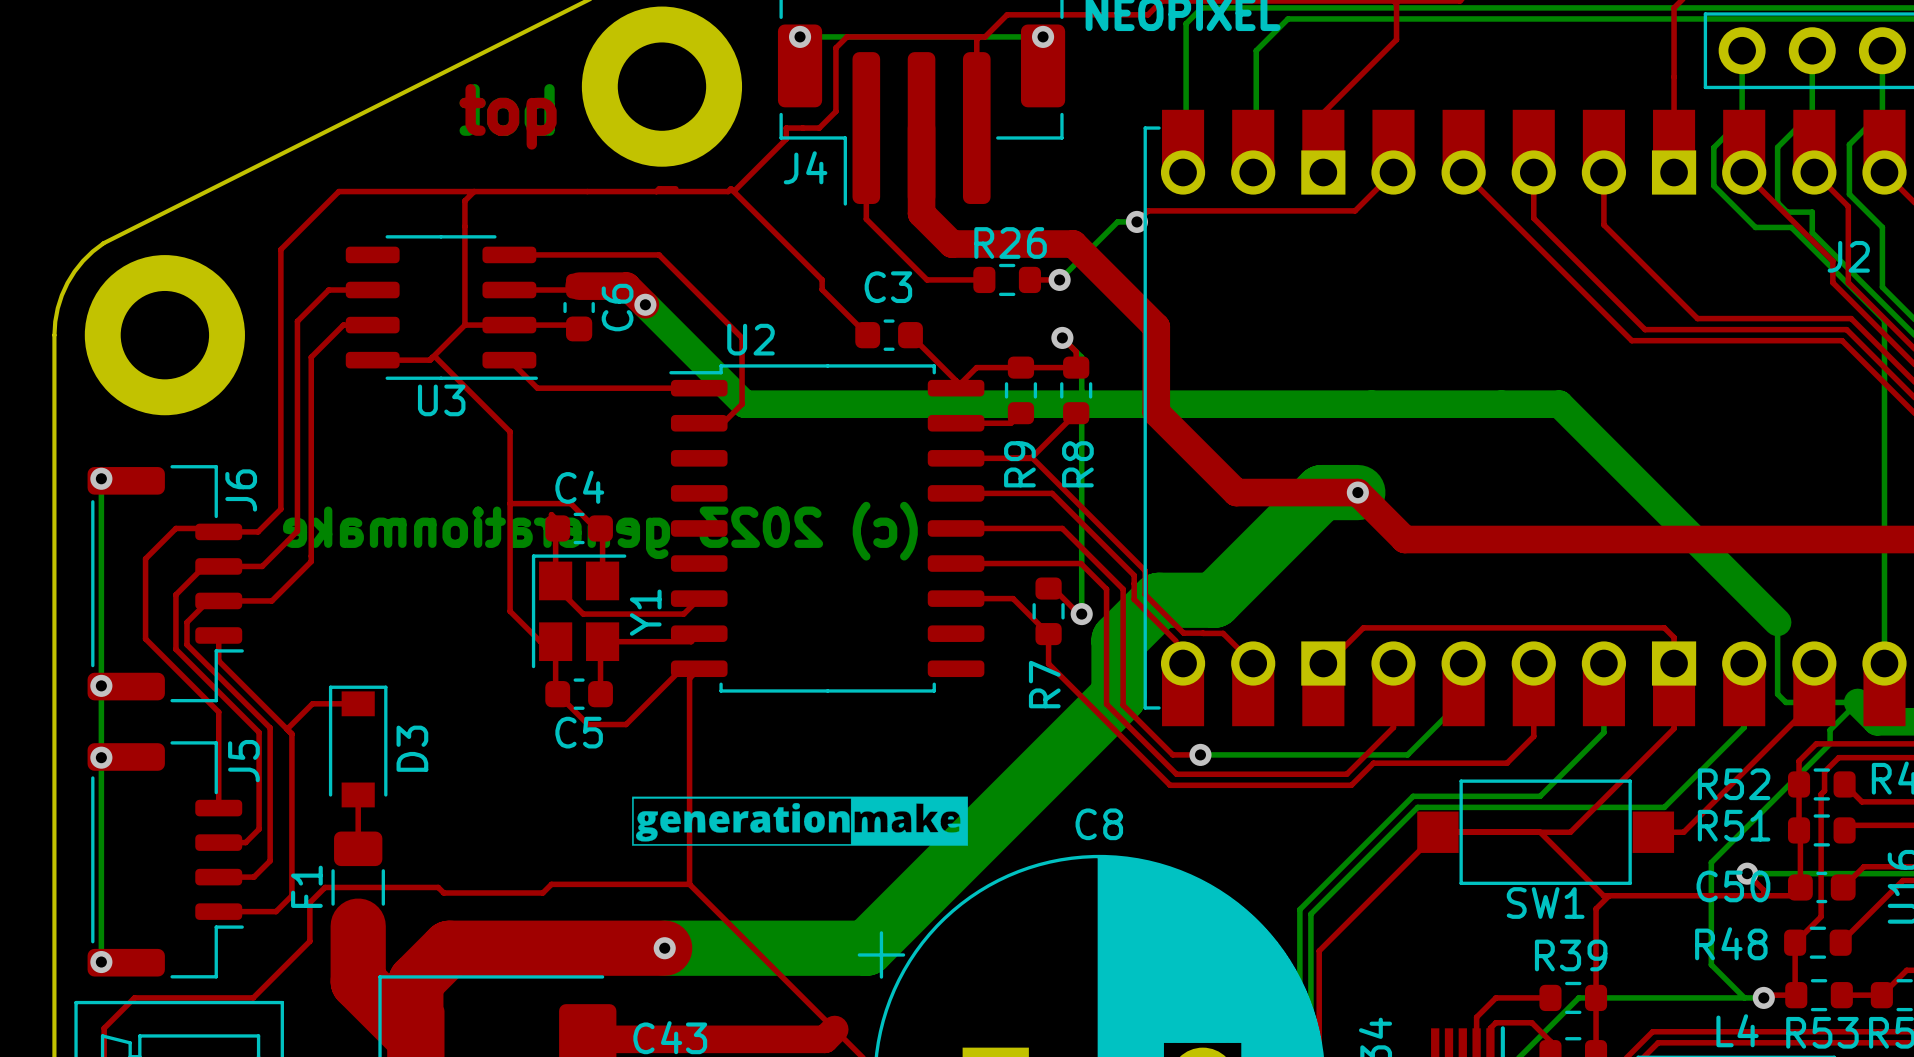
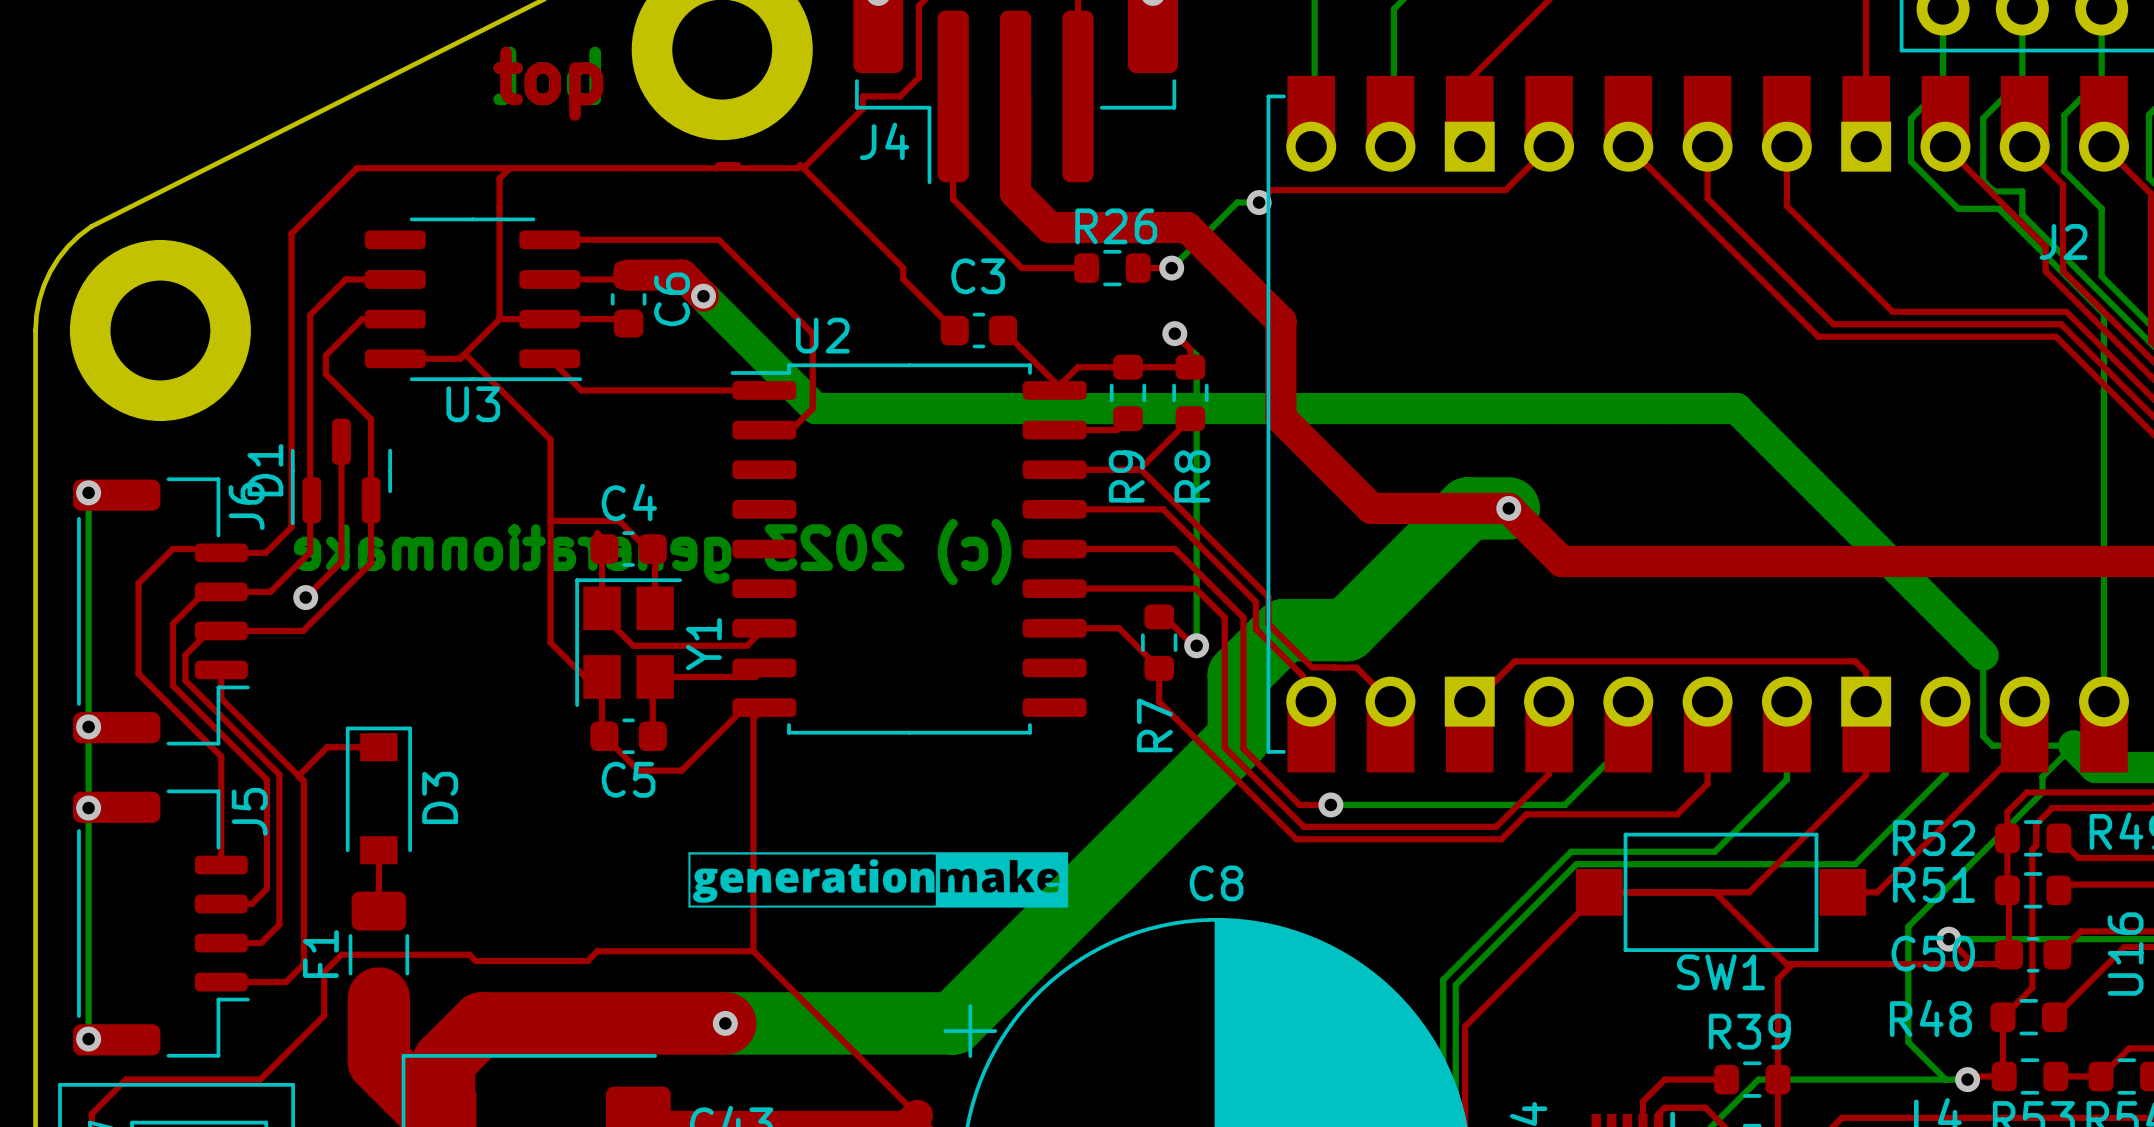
top track: (311, 373) (311, 561) (271, 600) -> (325, 374) (371, 419) (371, 563) (303, 630) (281, 630)
top track: none -> (341, 441) (341, 561) (305, 597)
D1: none -> (341, 471)
via: none -> (305, 597)

